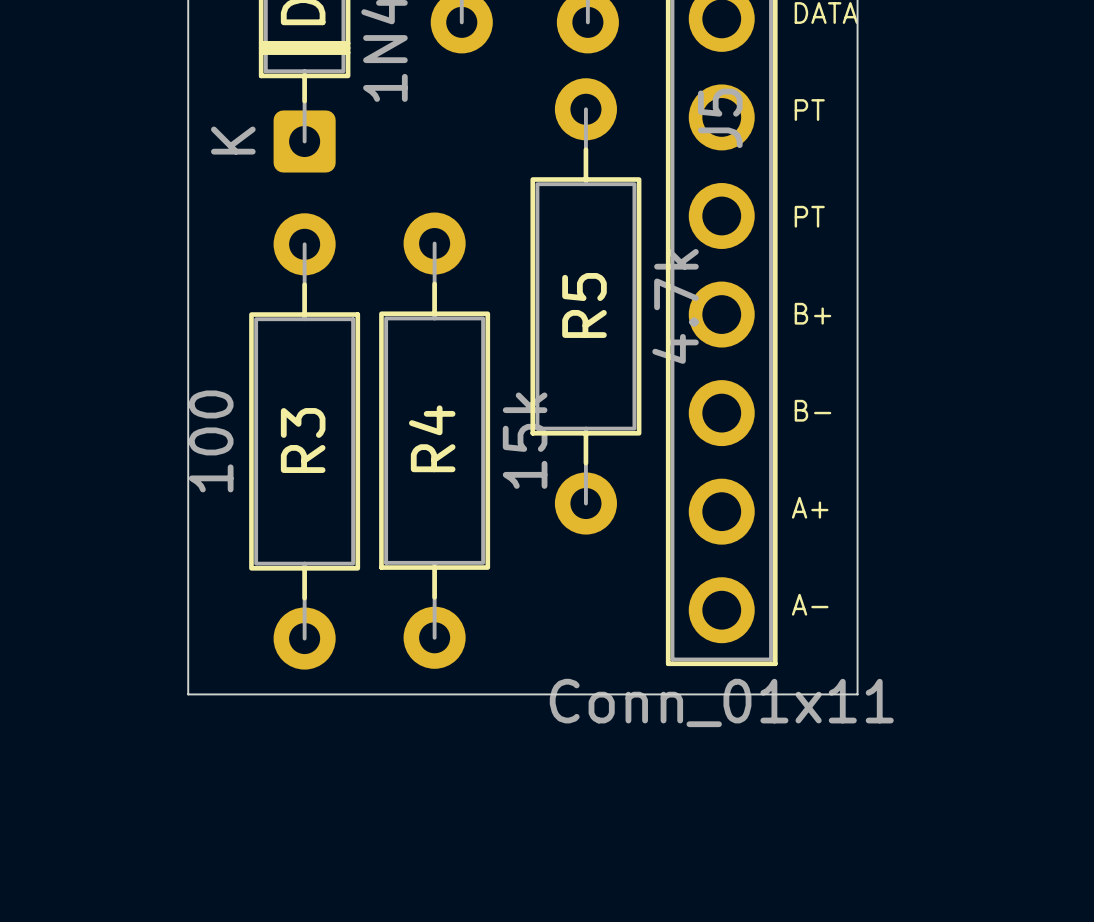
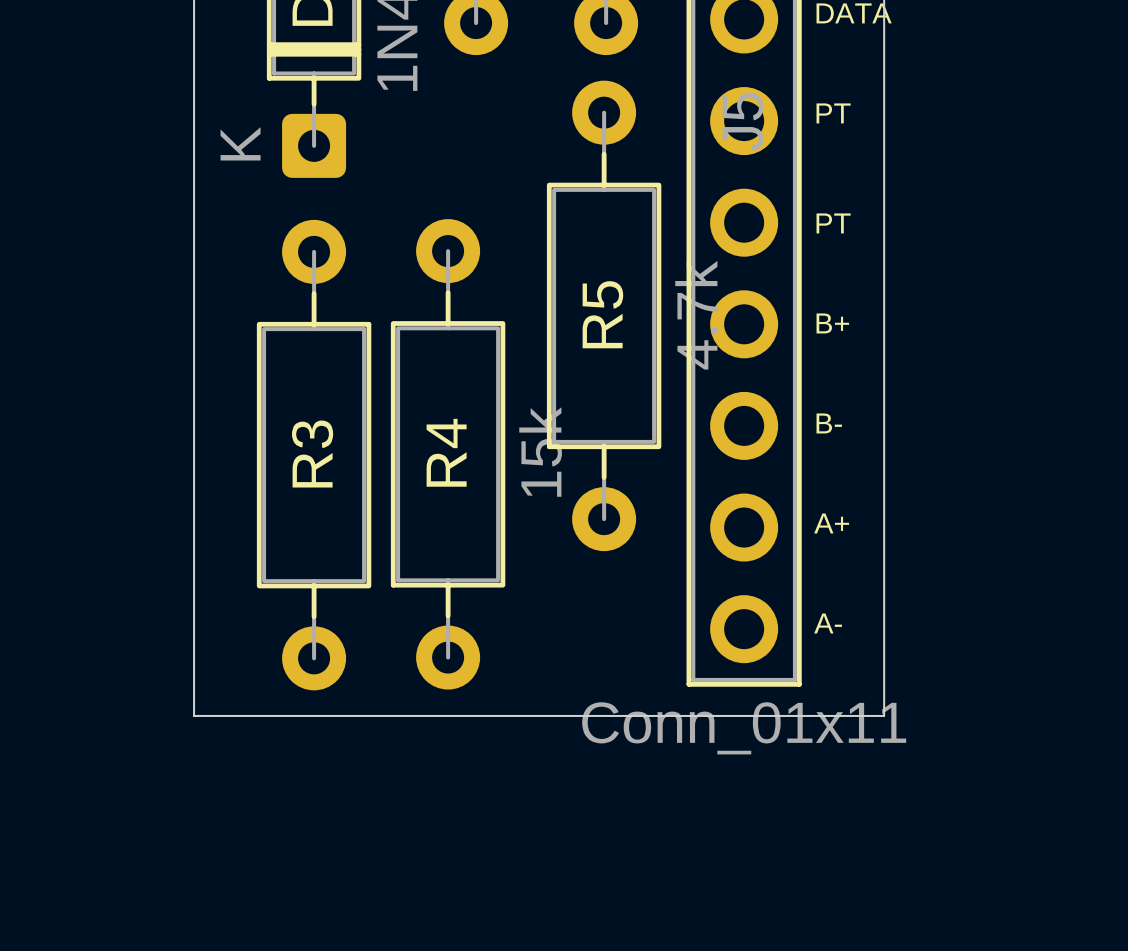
R3 value: 100 (211, 441) -> none

